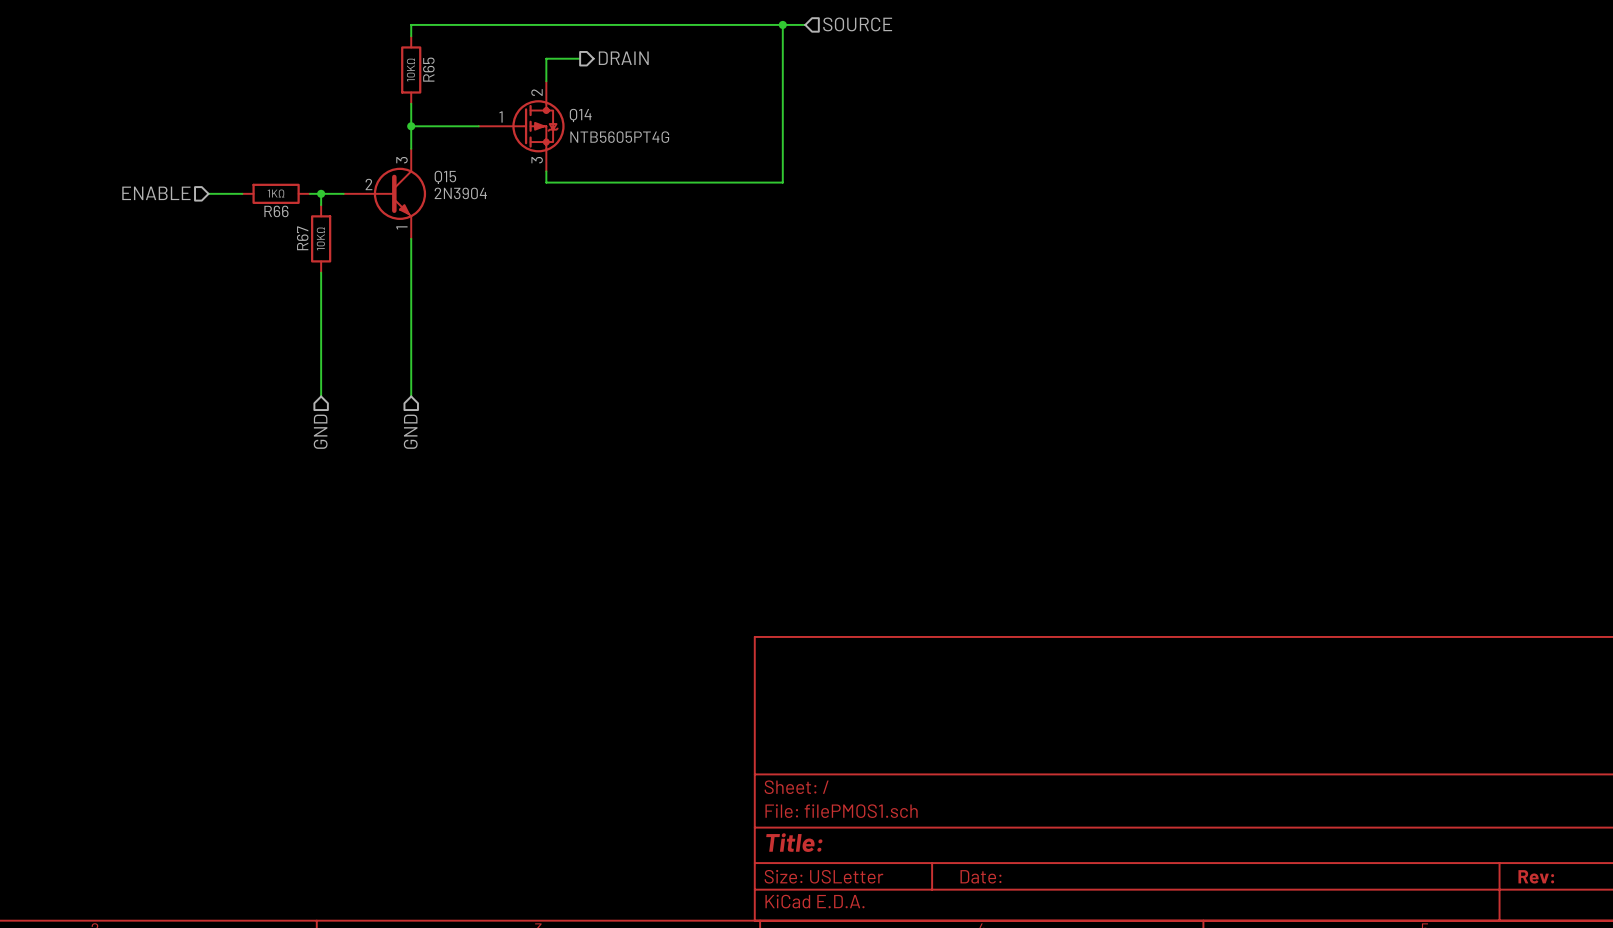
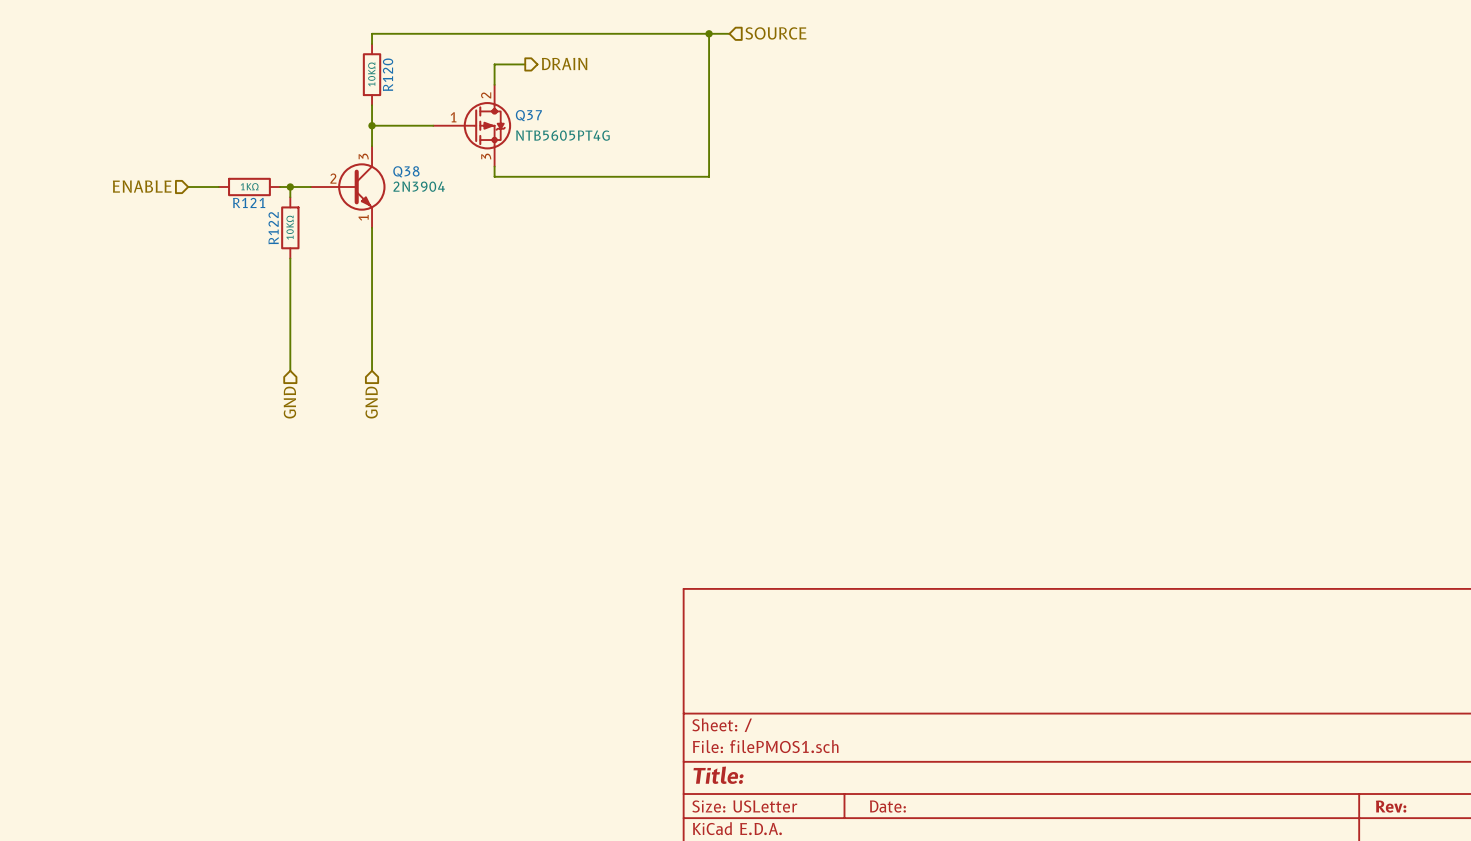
R65 name: R65 (428, 69) -> R120 (388, 74)
Q14 name: Q14 (580, 115) -> Q37 (528, 115)
Q15 name: Q15 (445, 177) -> Q38 (406, 171)
R66 name: R66 (276, 211) -> R121 (249, 202)
R67 name: R67 (302, 238) -> R122 (273, 228)

